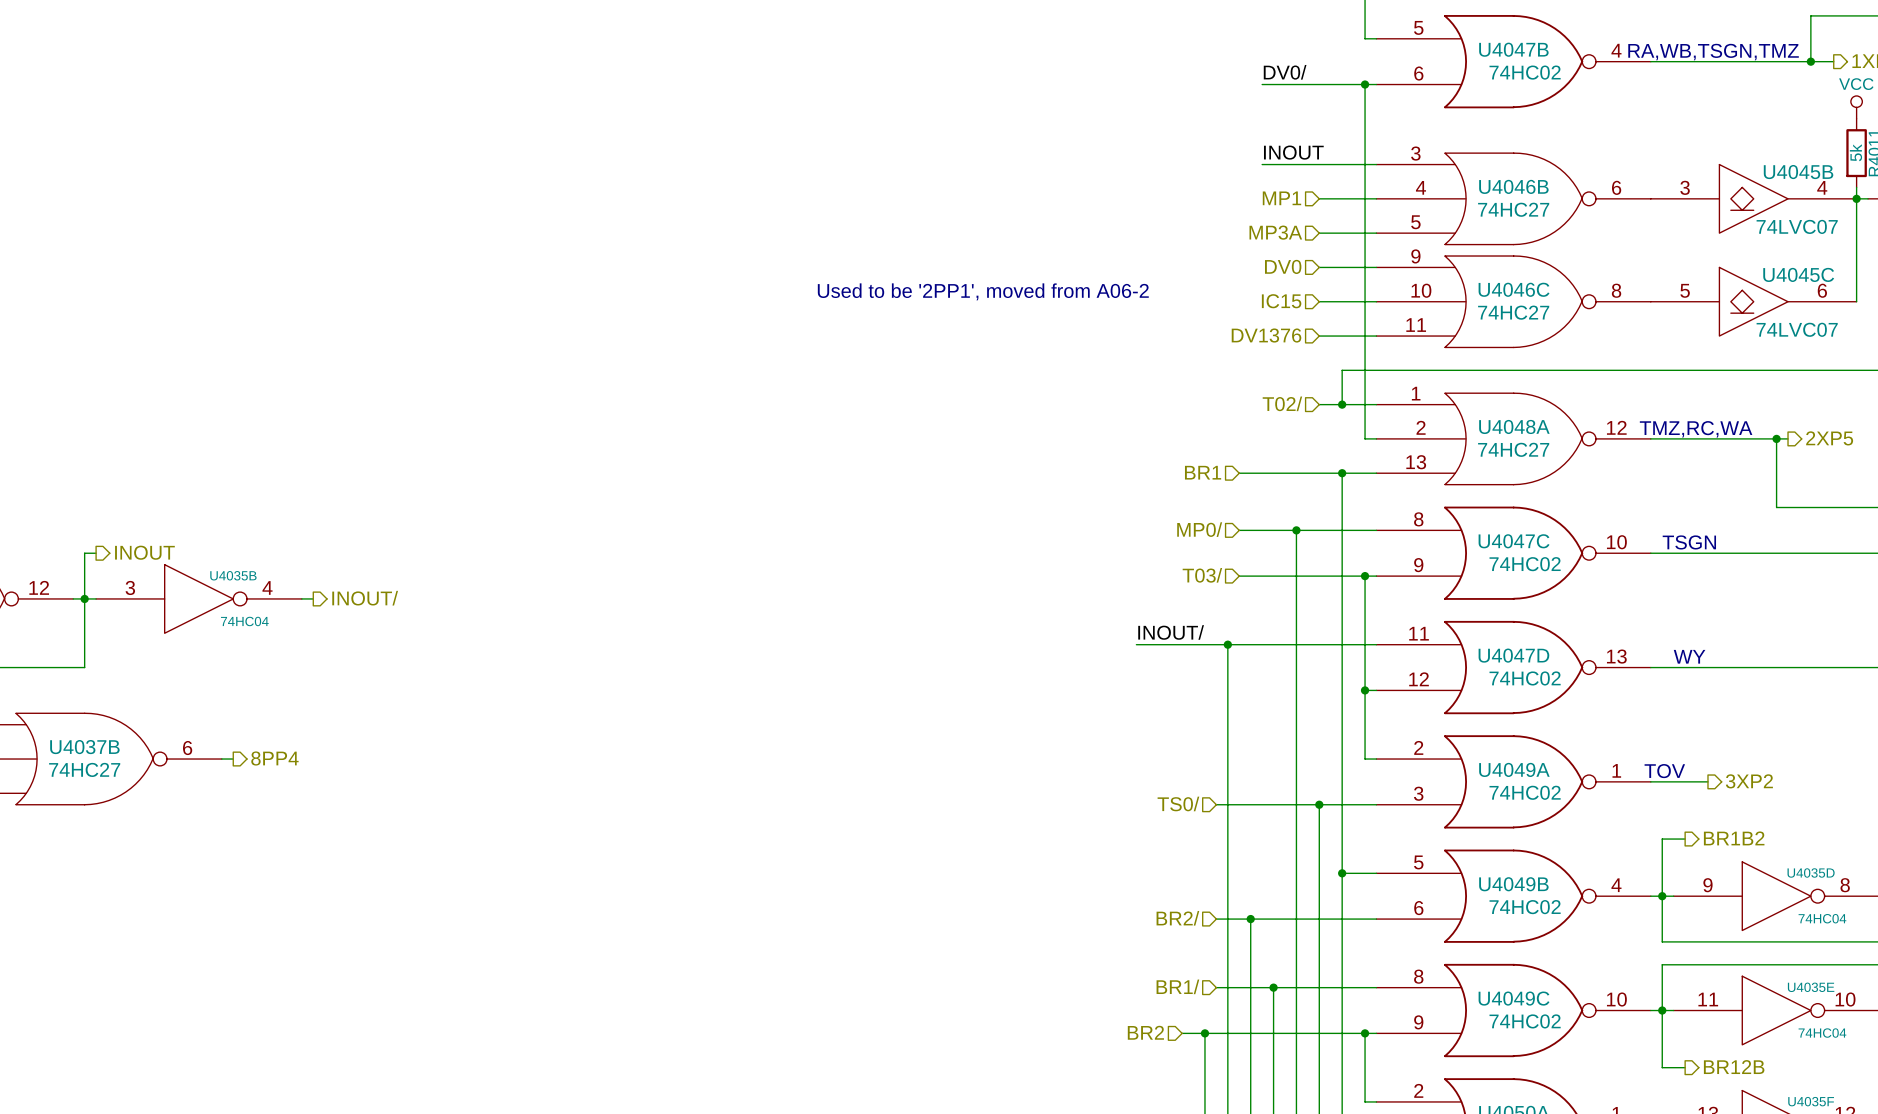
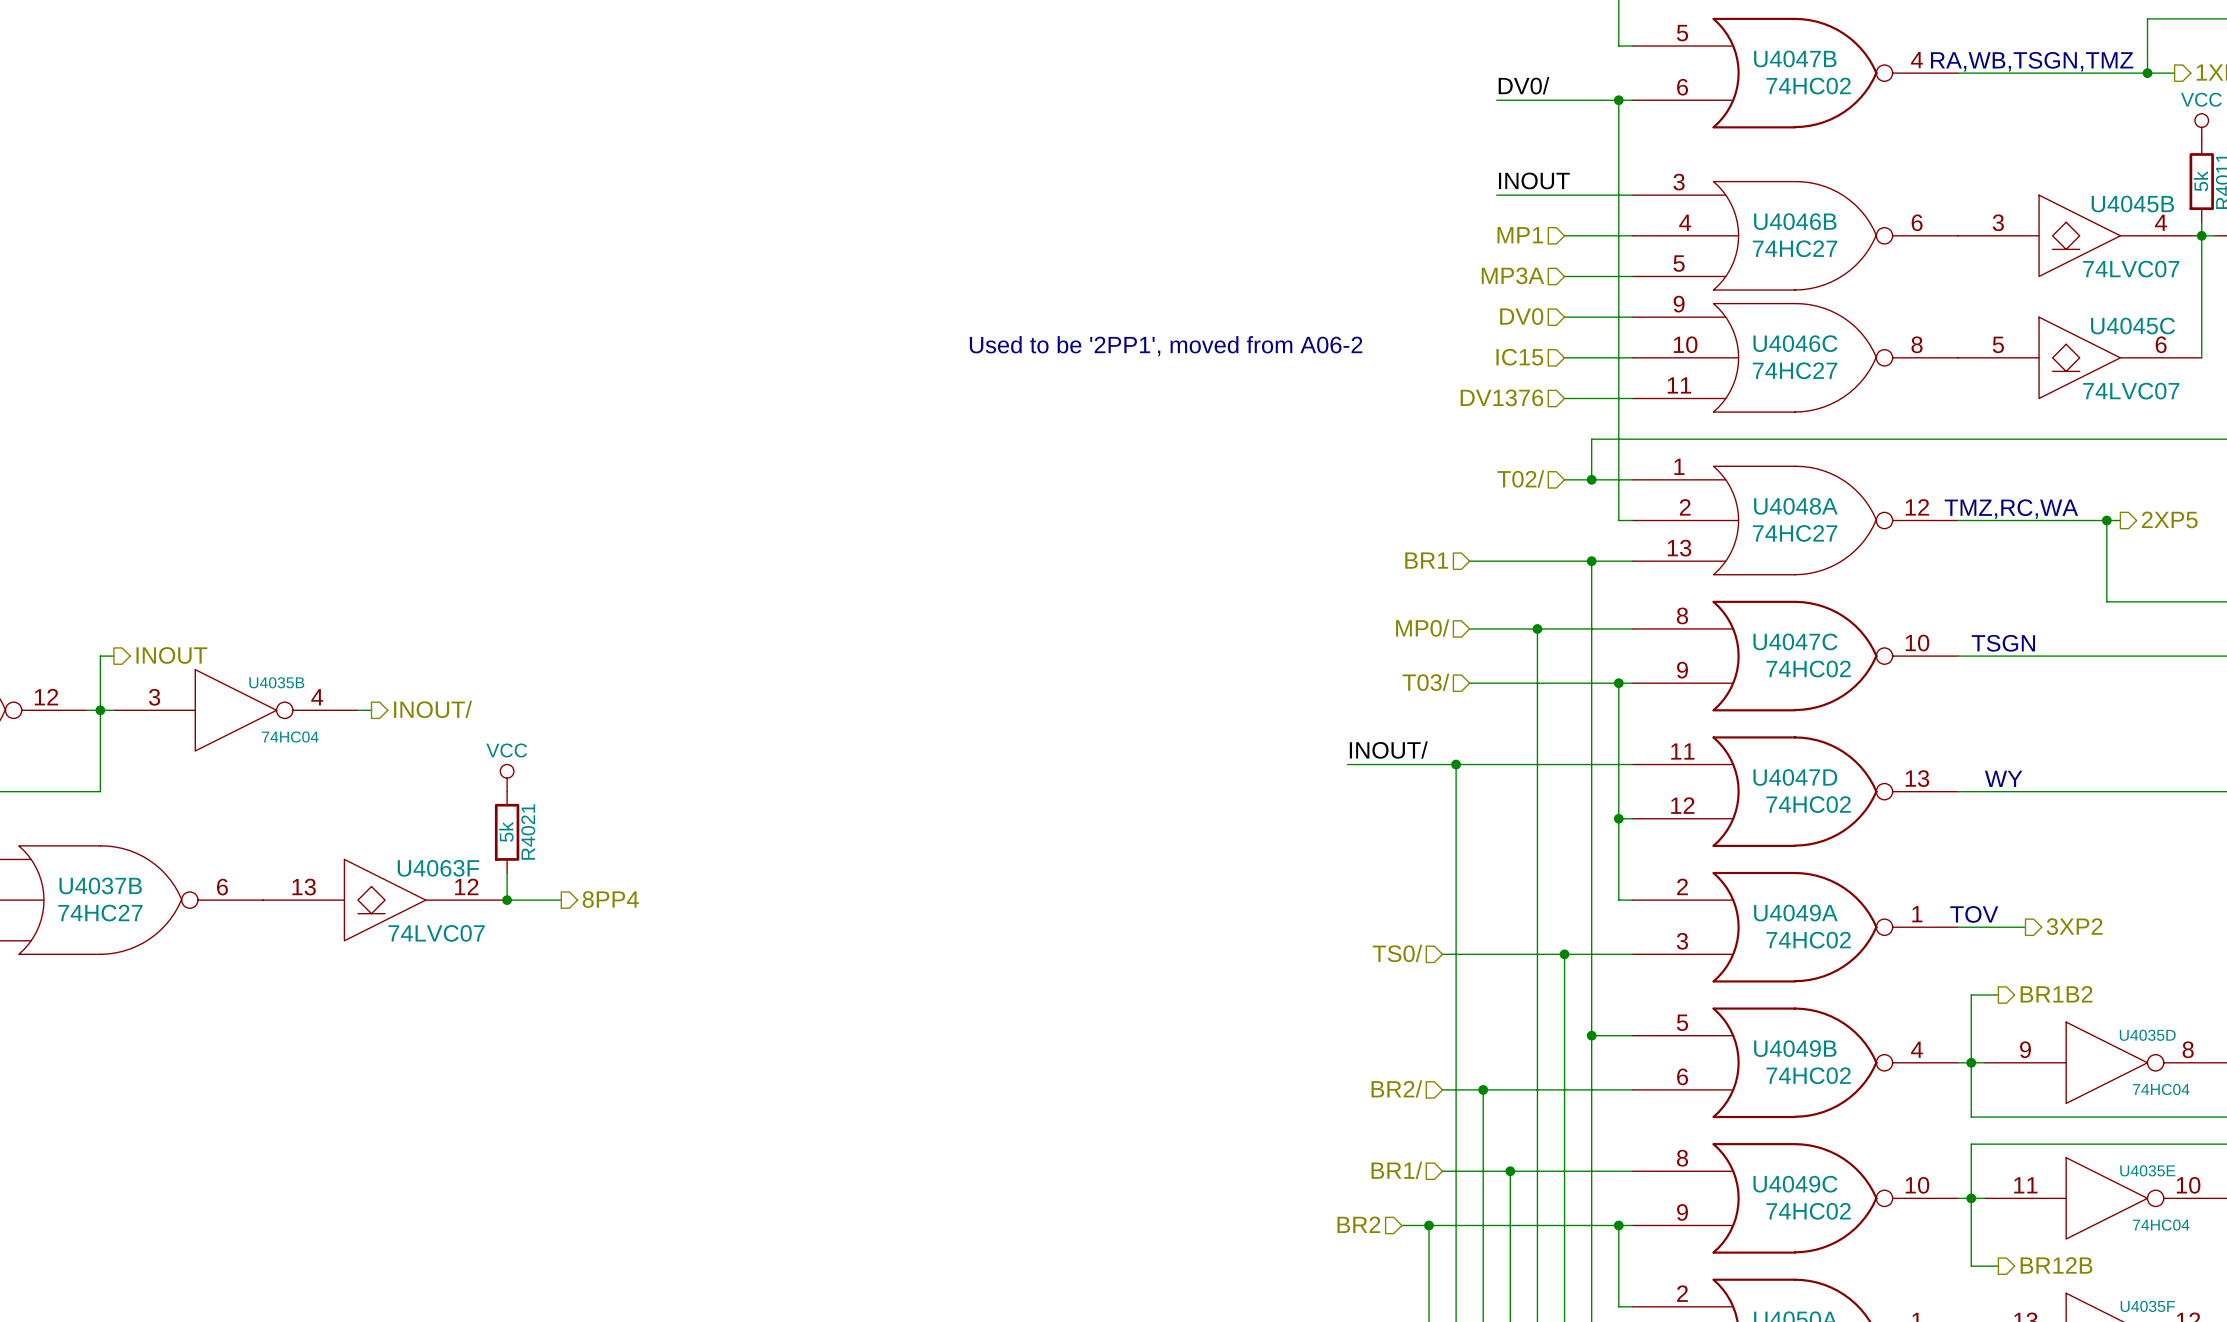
power symbol: none -> VCC (507, 778)
R4021: none -> 5k (507, 832)
wire: none -> (507, 873) (507, 900) (561, 900)
hierarchical label: 8PP4 (274, 758) -> none
hierarchical label: none -> 8PP4 (610, 899)
U4063F: none -> 74LVC07 (385, 900)
junction: none -> (507, 900)

